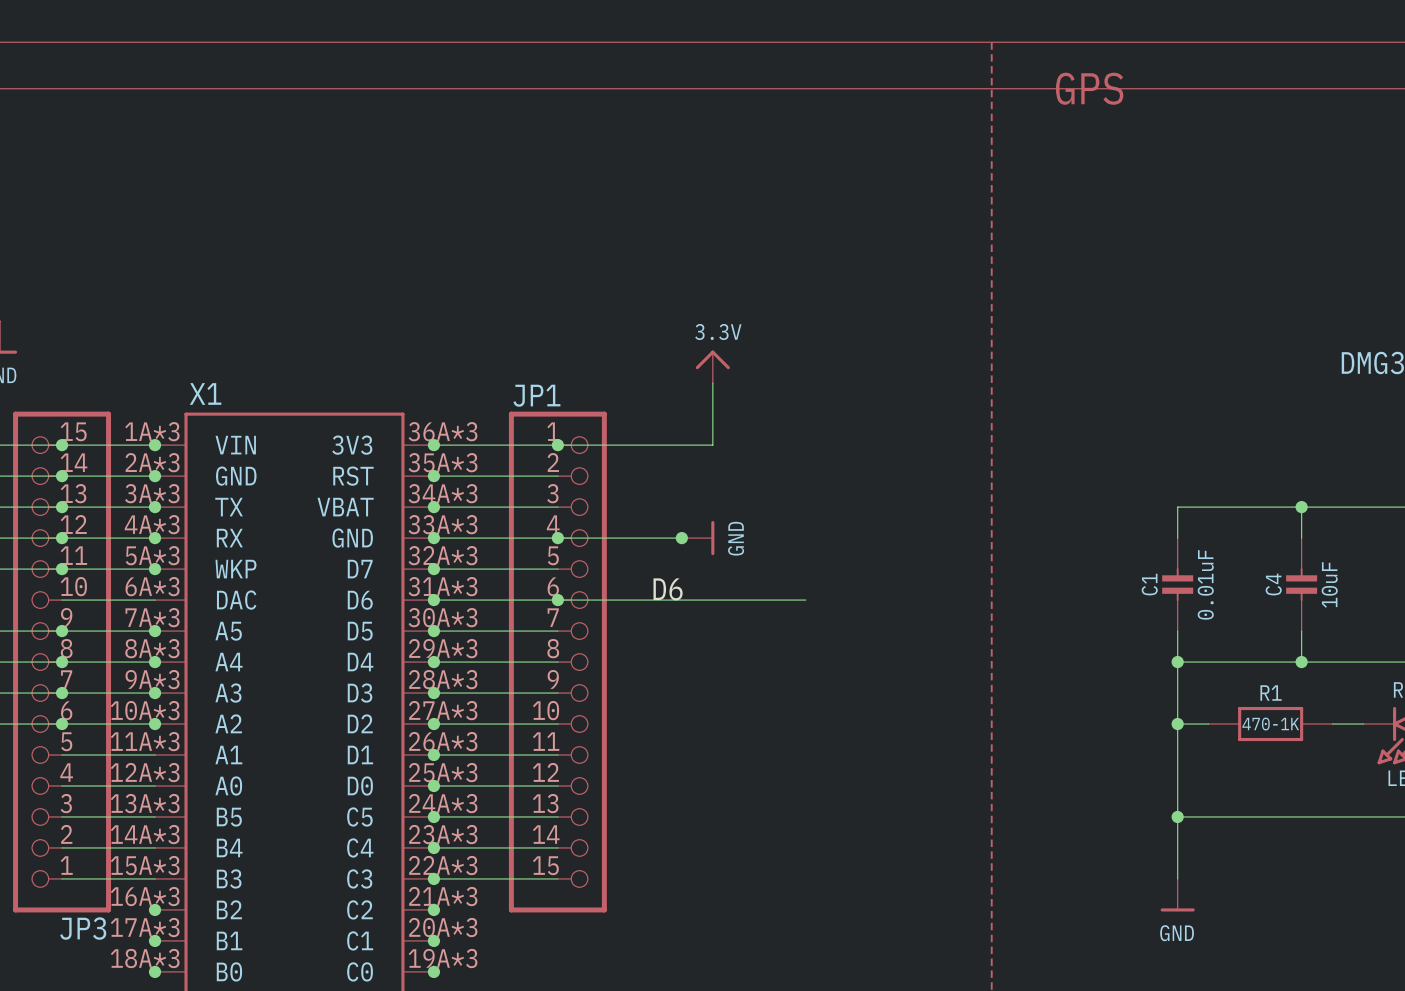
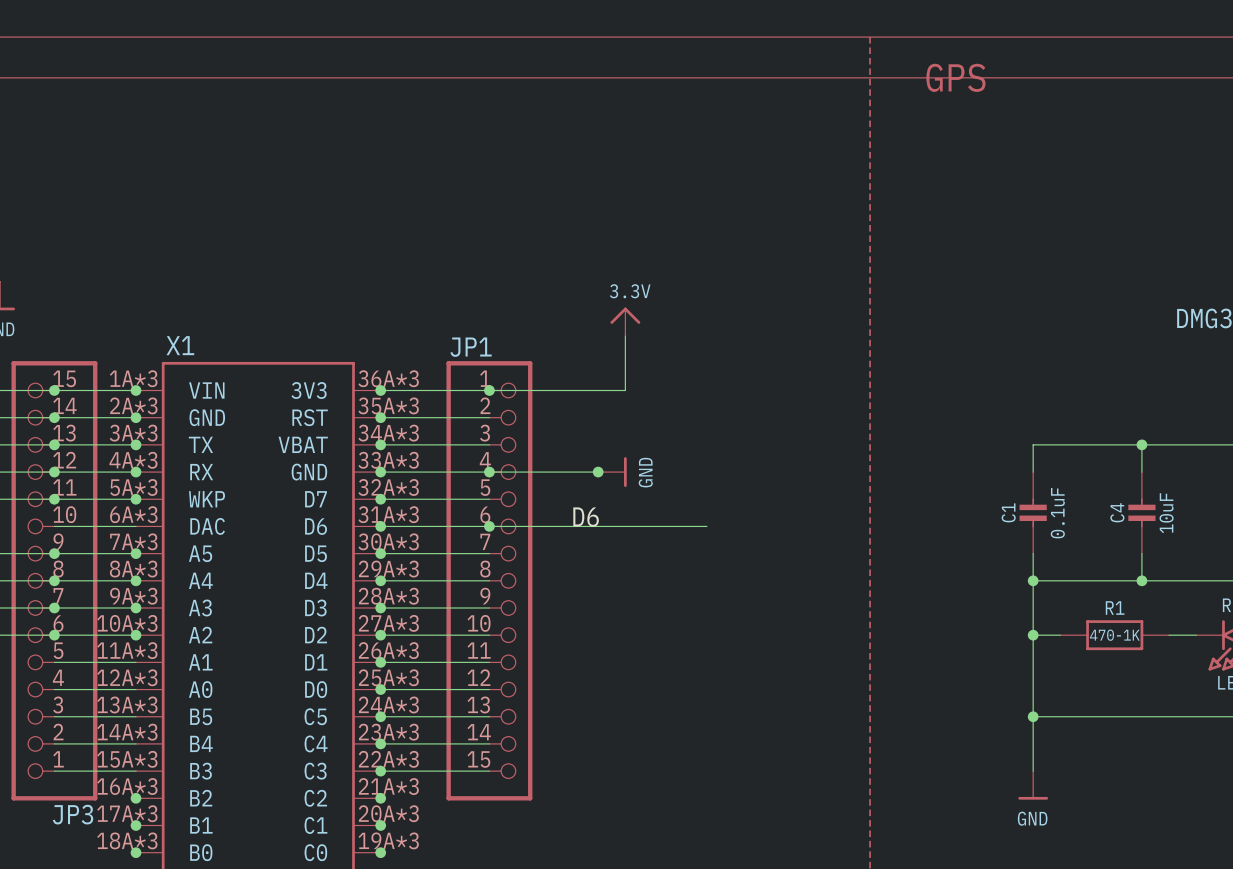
C1 value: 0.01uF (1205, 584) -> 0.1uF (1057, 513)

